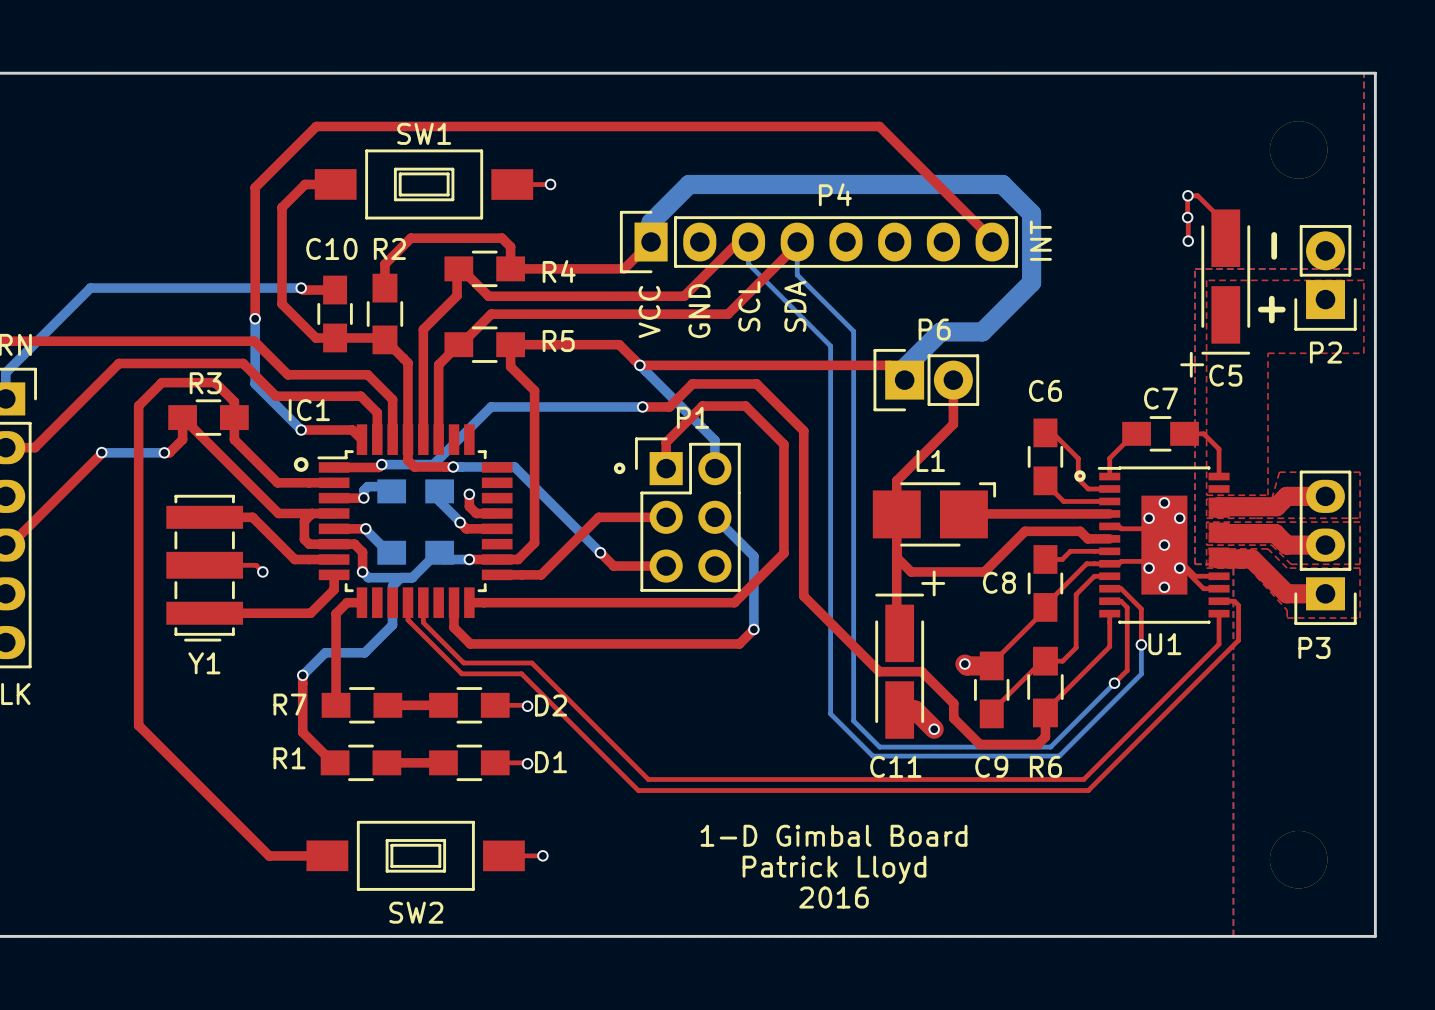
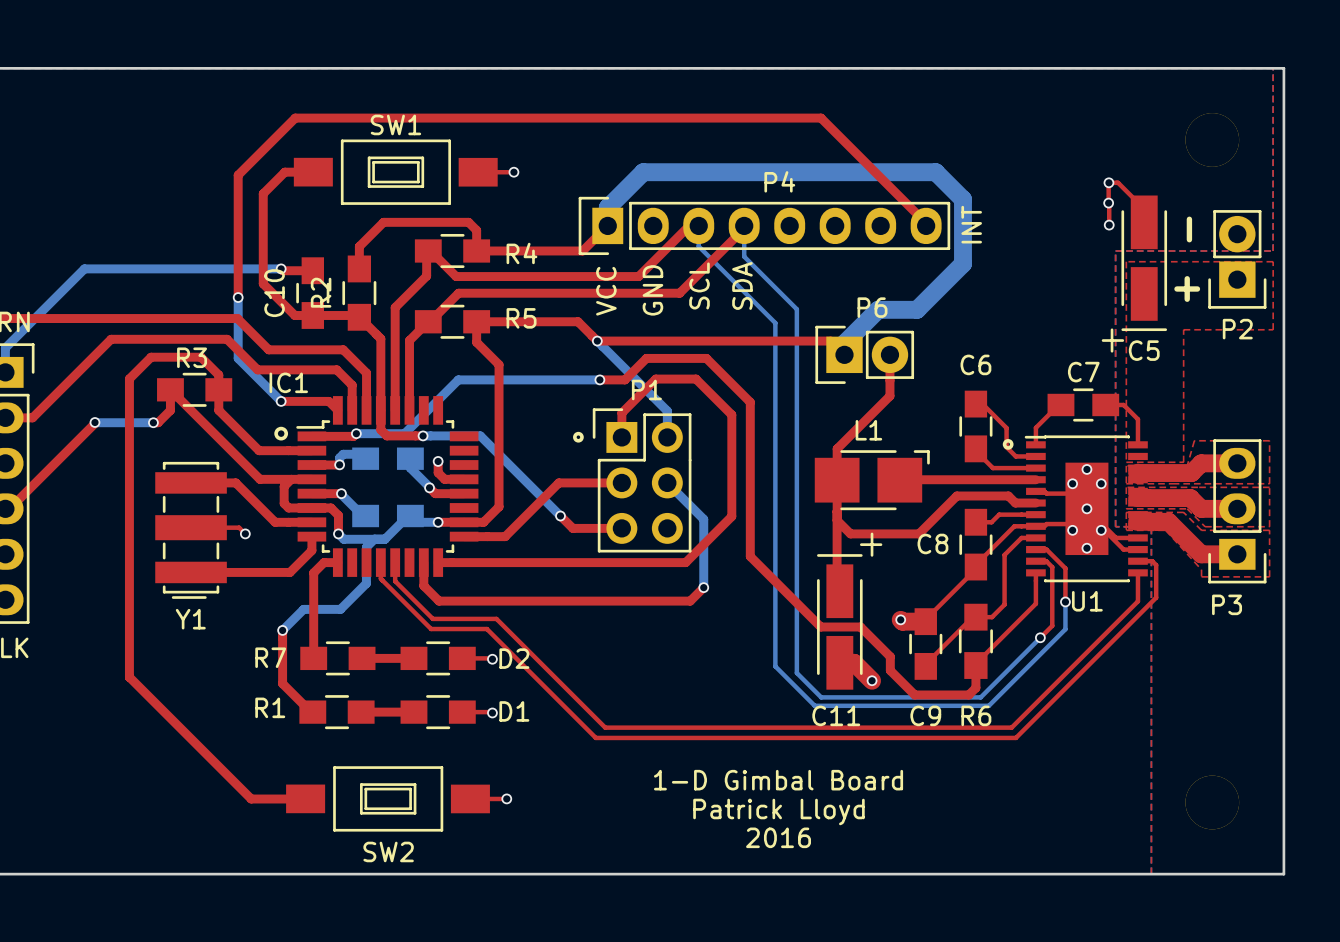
C10 name rotation: 0° (331, 248) -> 90° counterclockwise (274, 293)
C10 name position: C10 (331, 248) -> C10 (274, 293)
R2 name rotation: 0° (389, 248) -> 90° counterclockwise (321, 292)
R2 name position: R2 (389, 248) -> R2 (321, 292)

